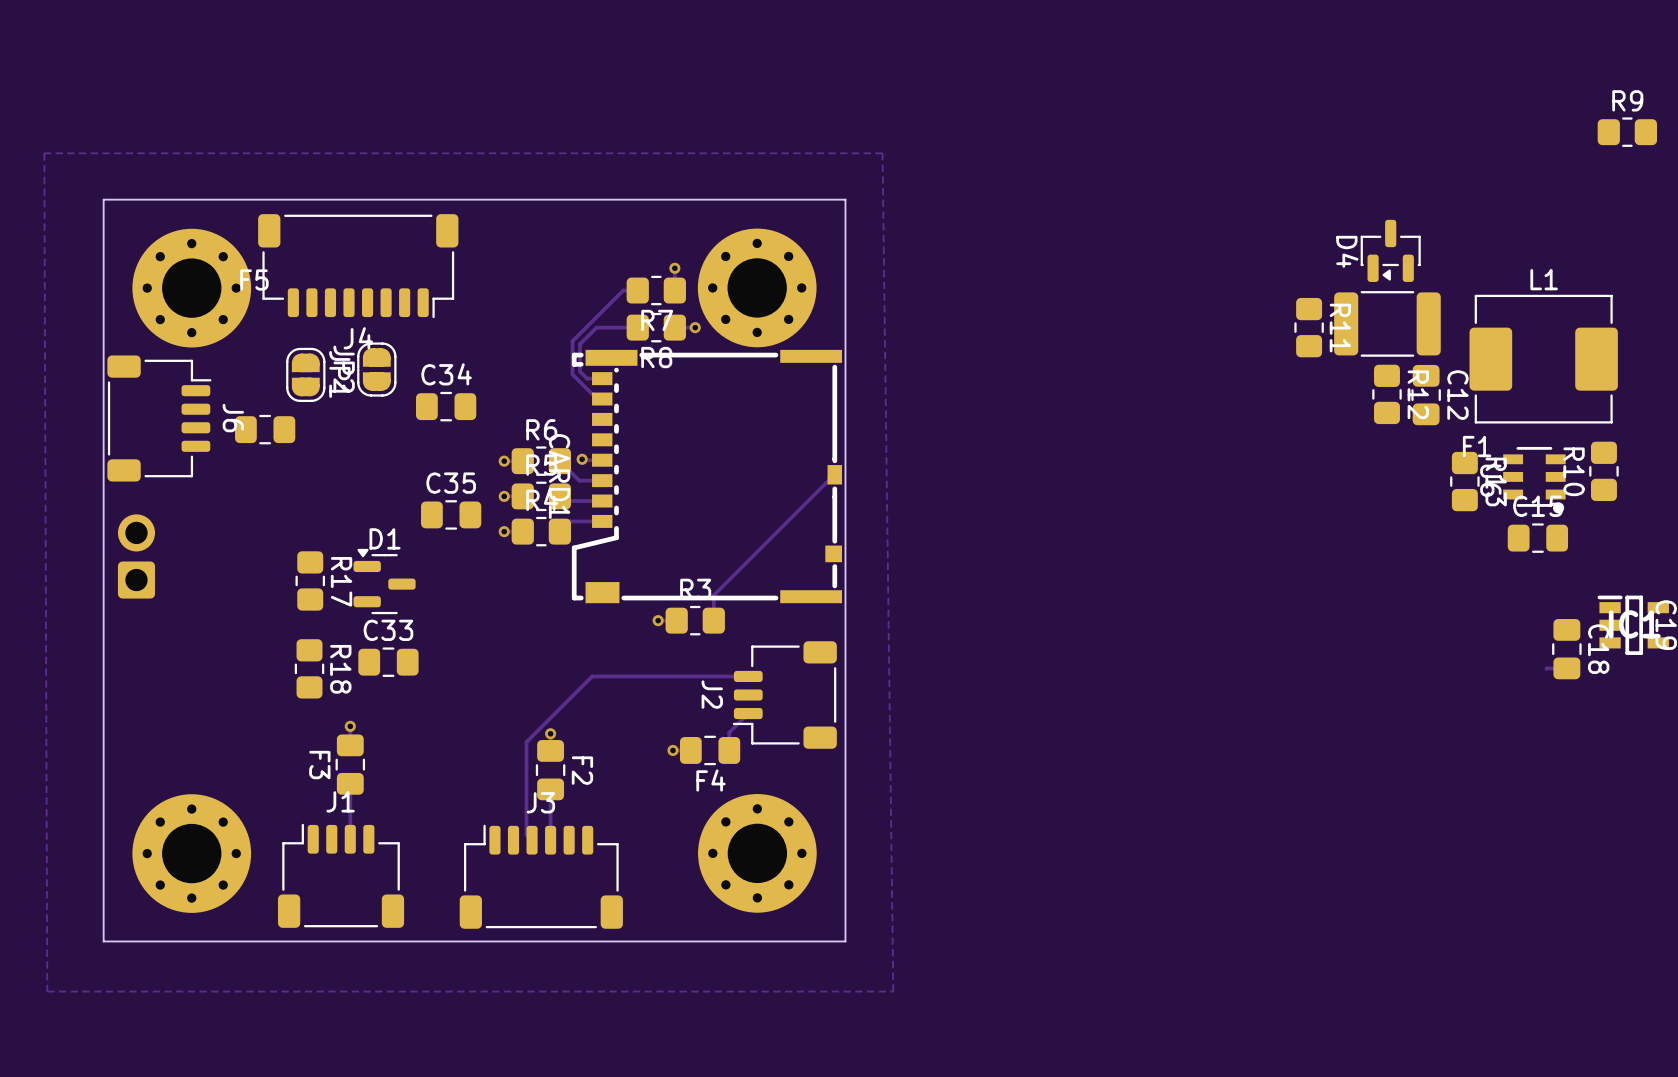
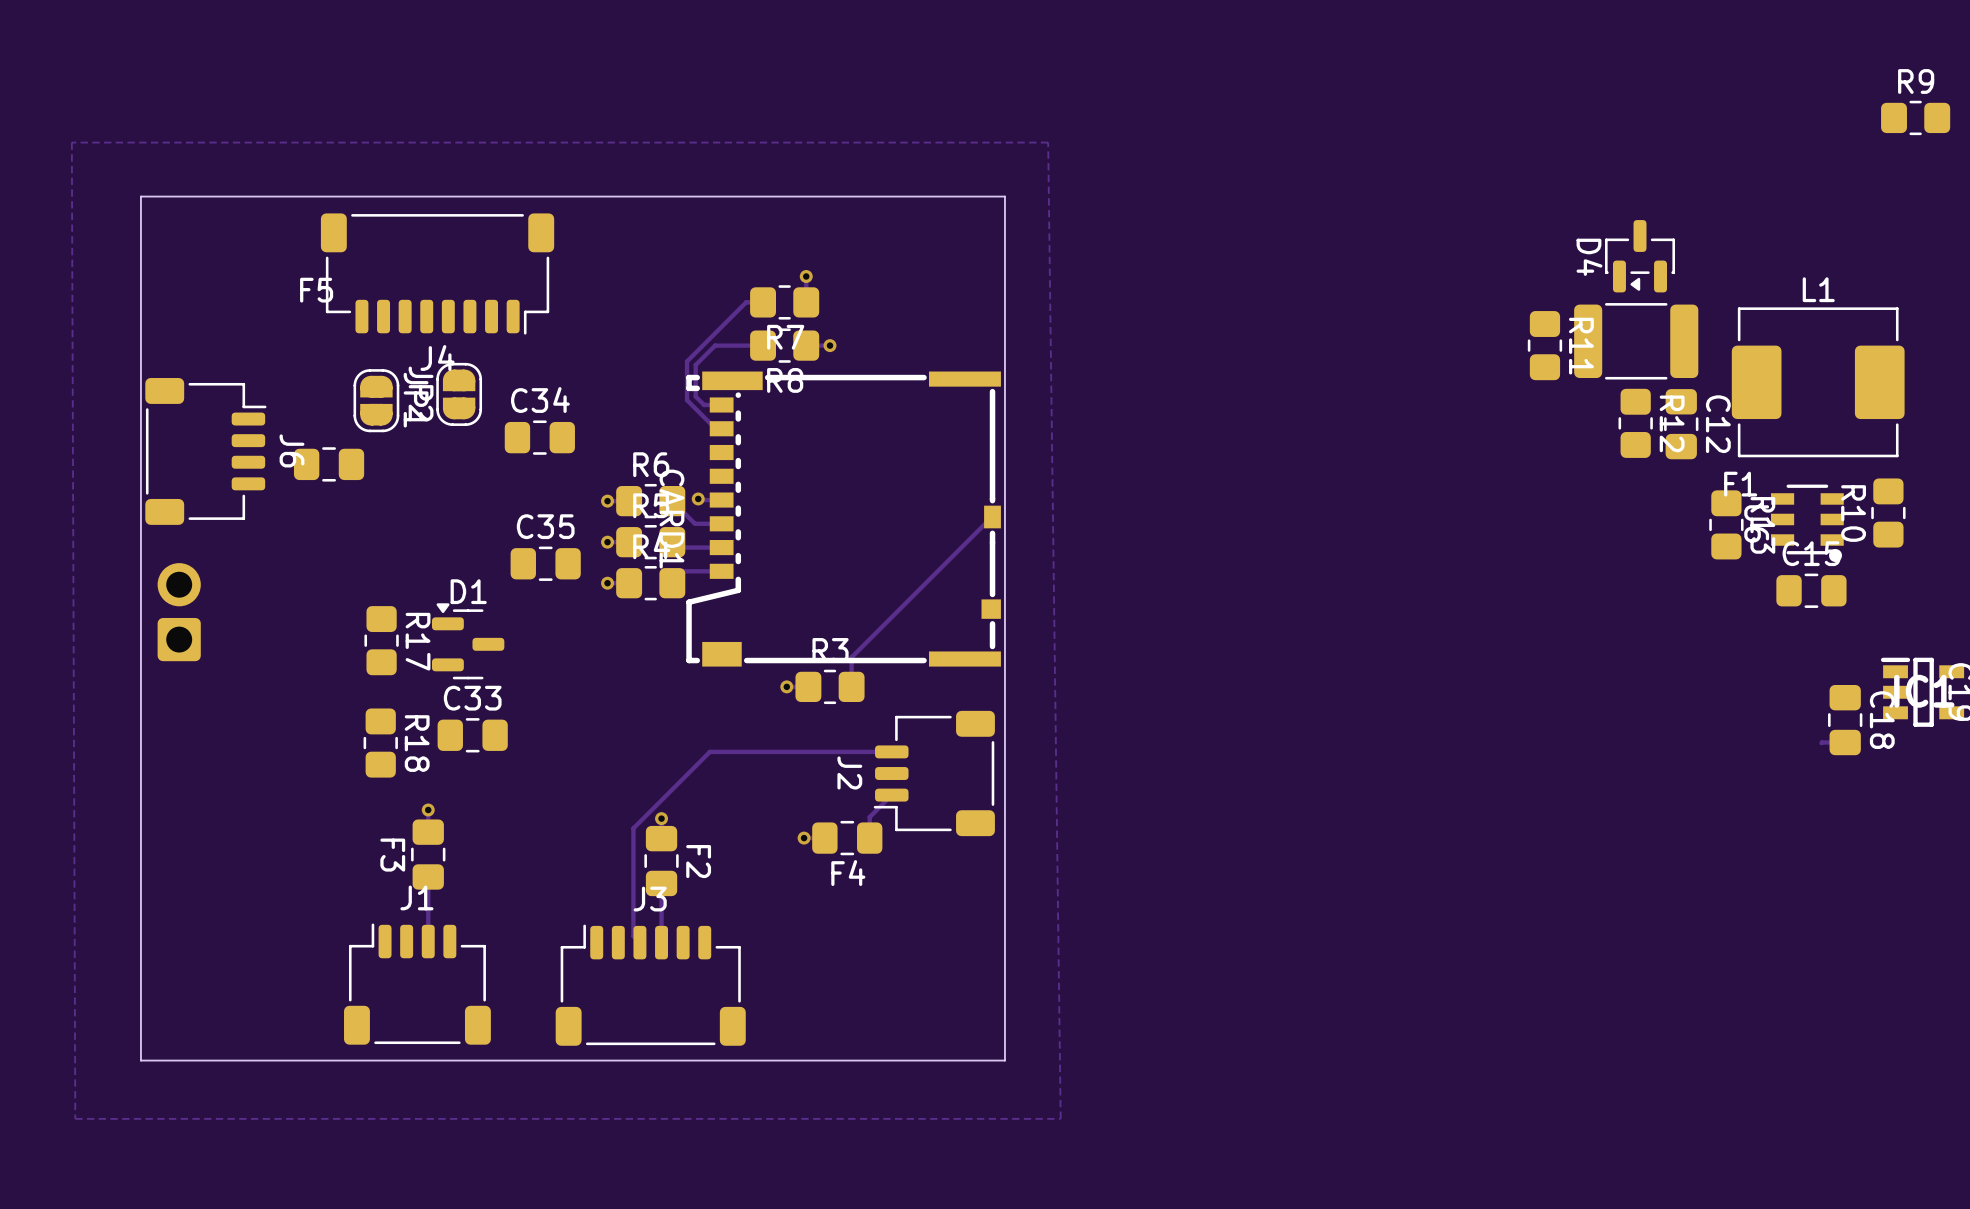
part: (757, 287) -> none
part: (191, 288) -> none
part: (191, 853) -> none
part: (757, 853) -> none

